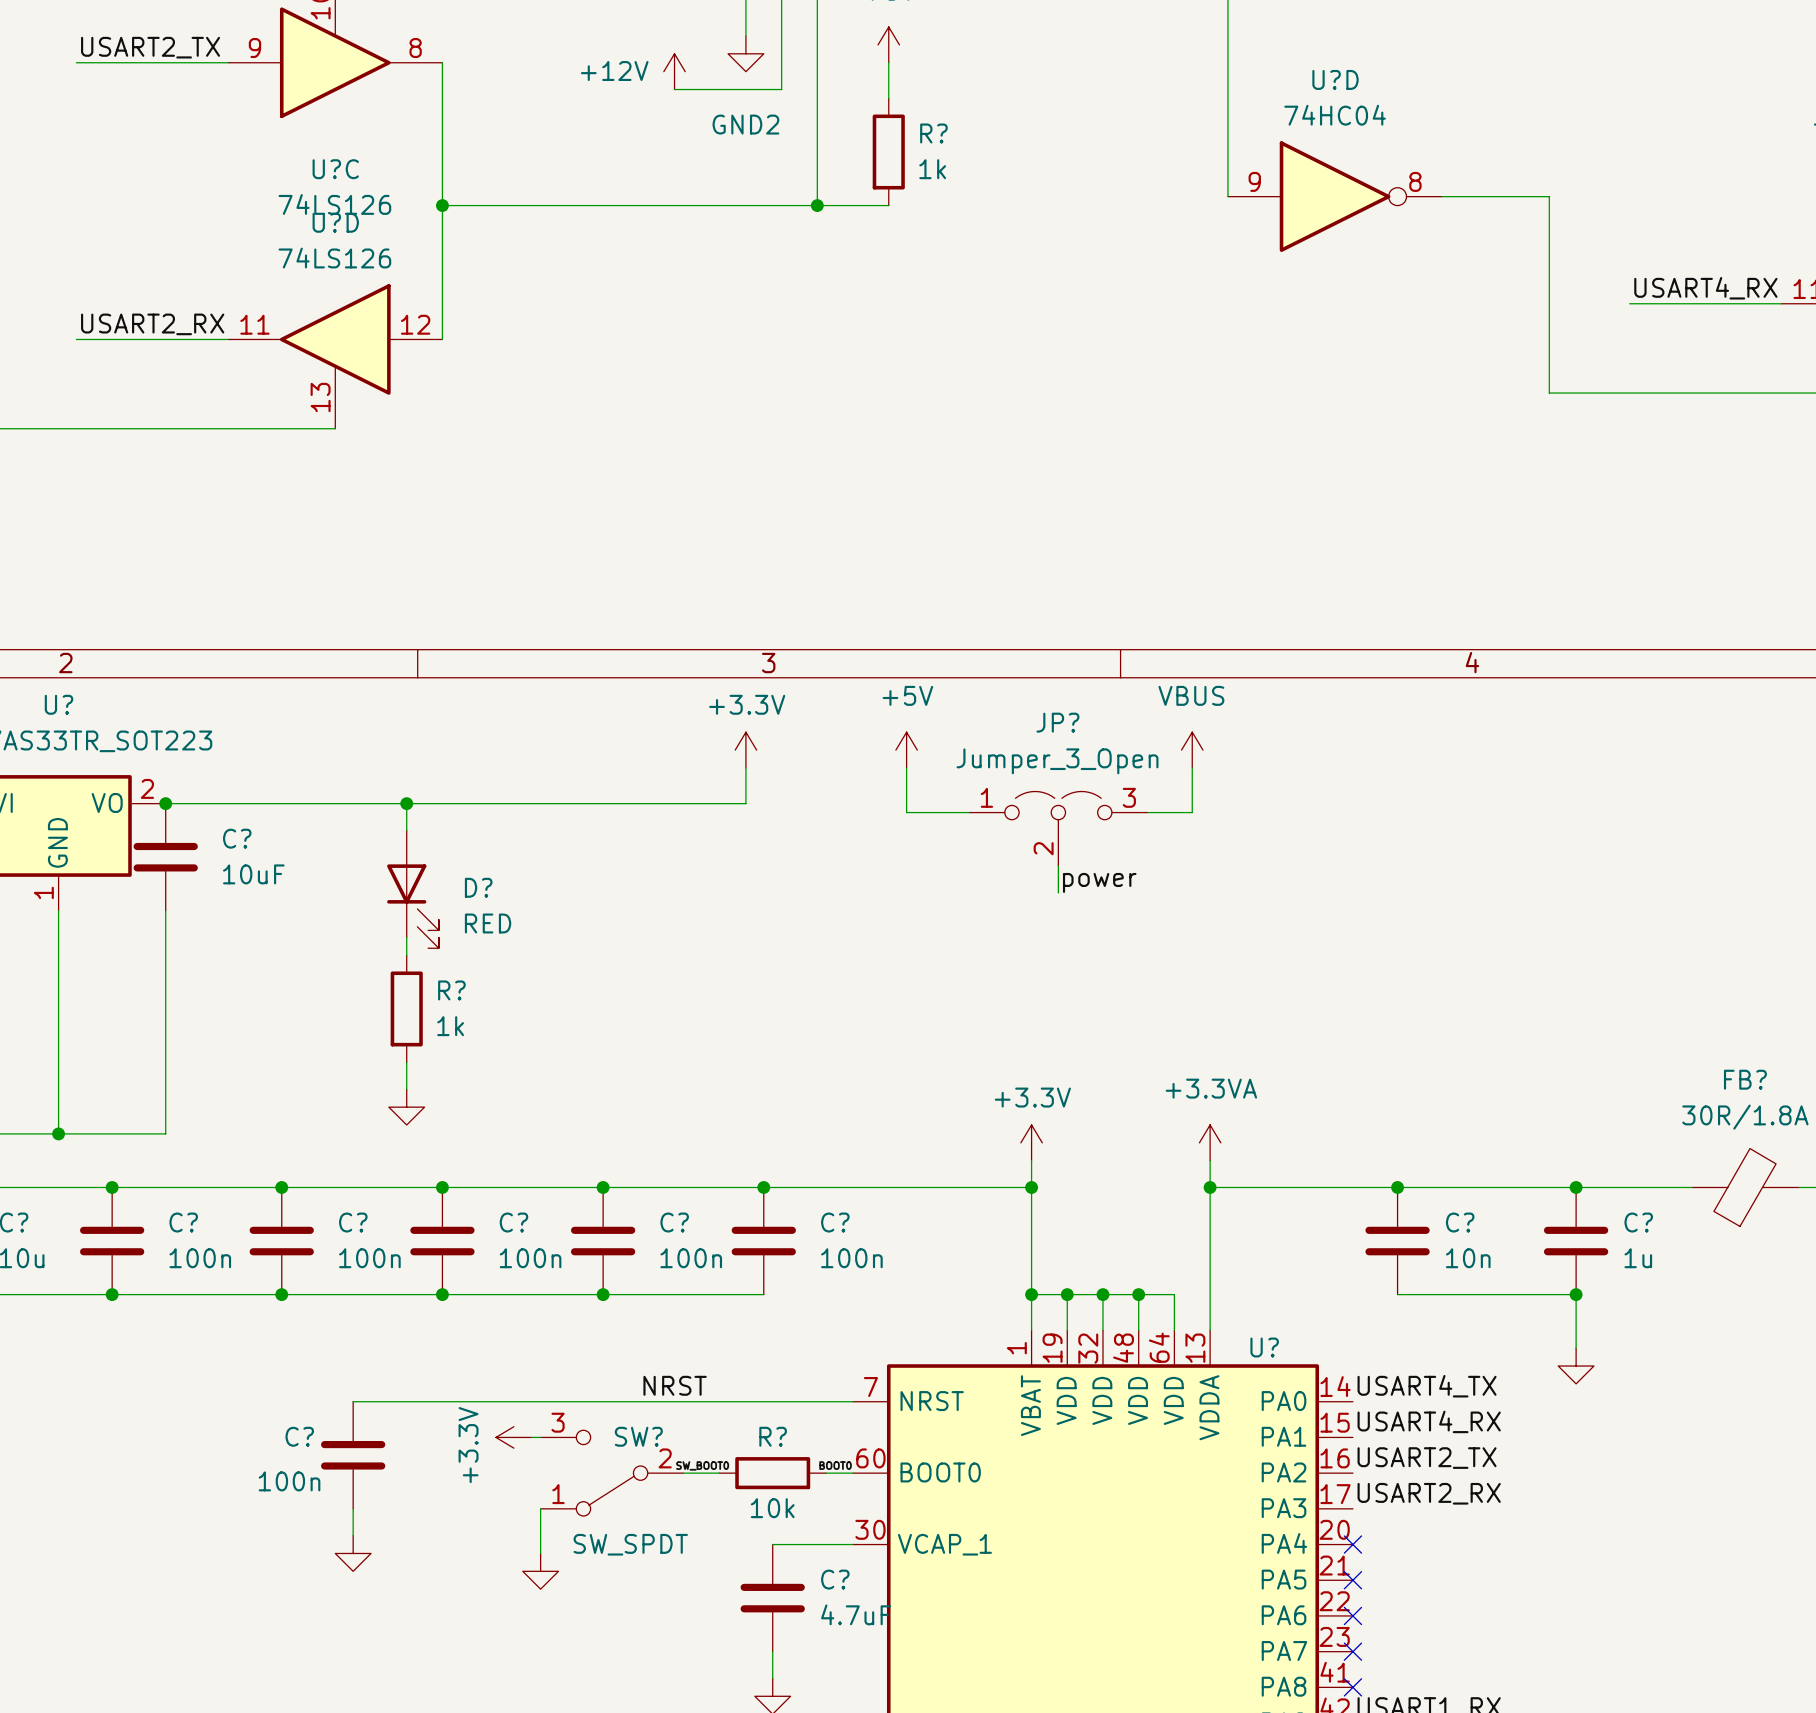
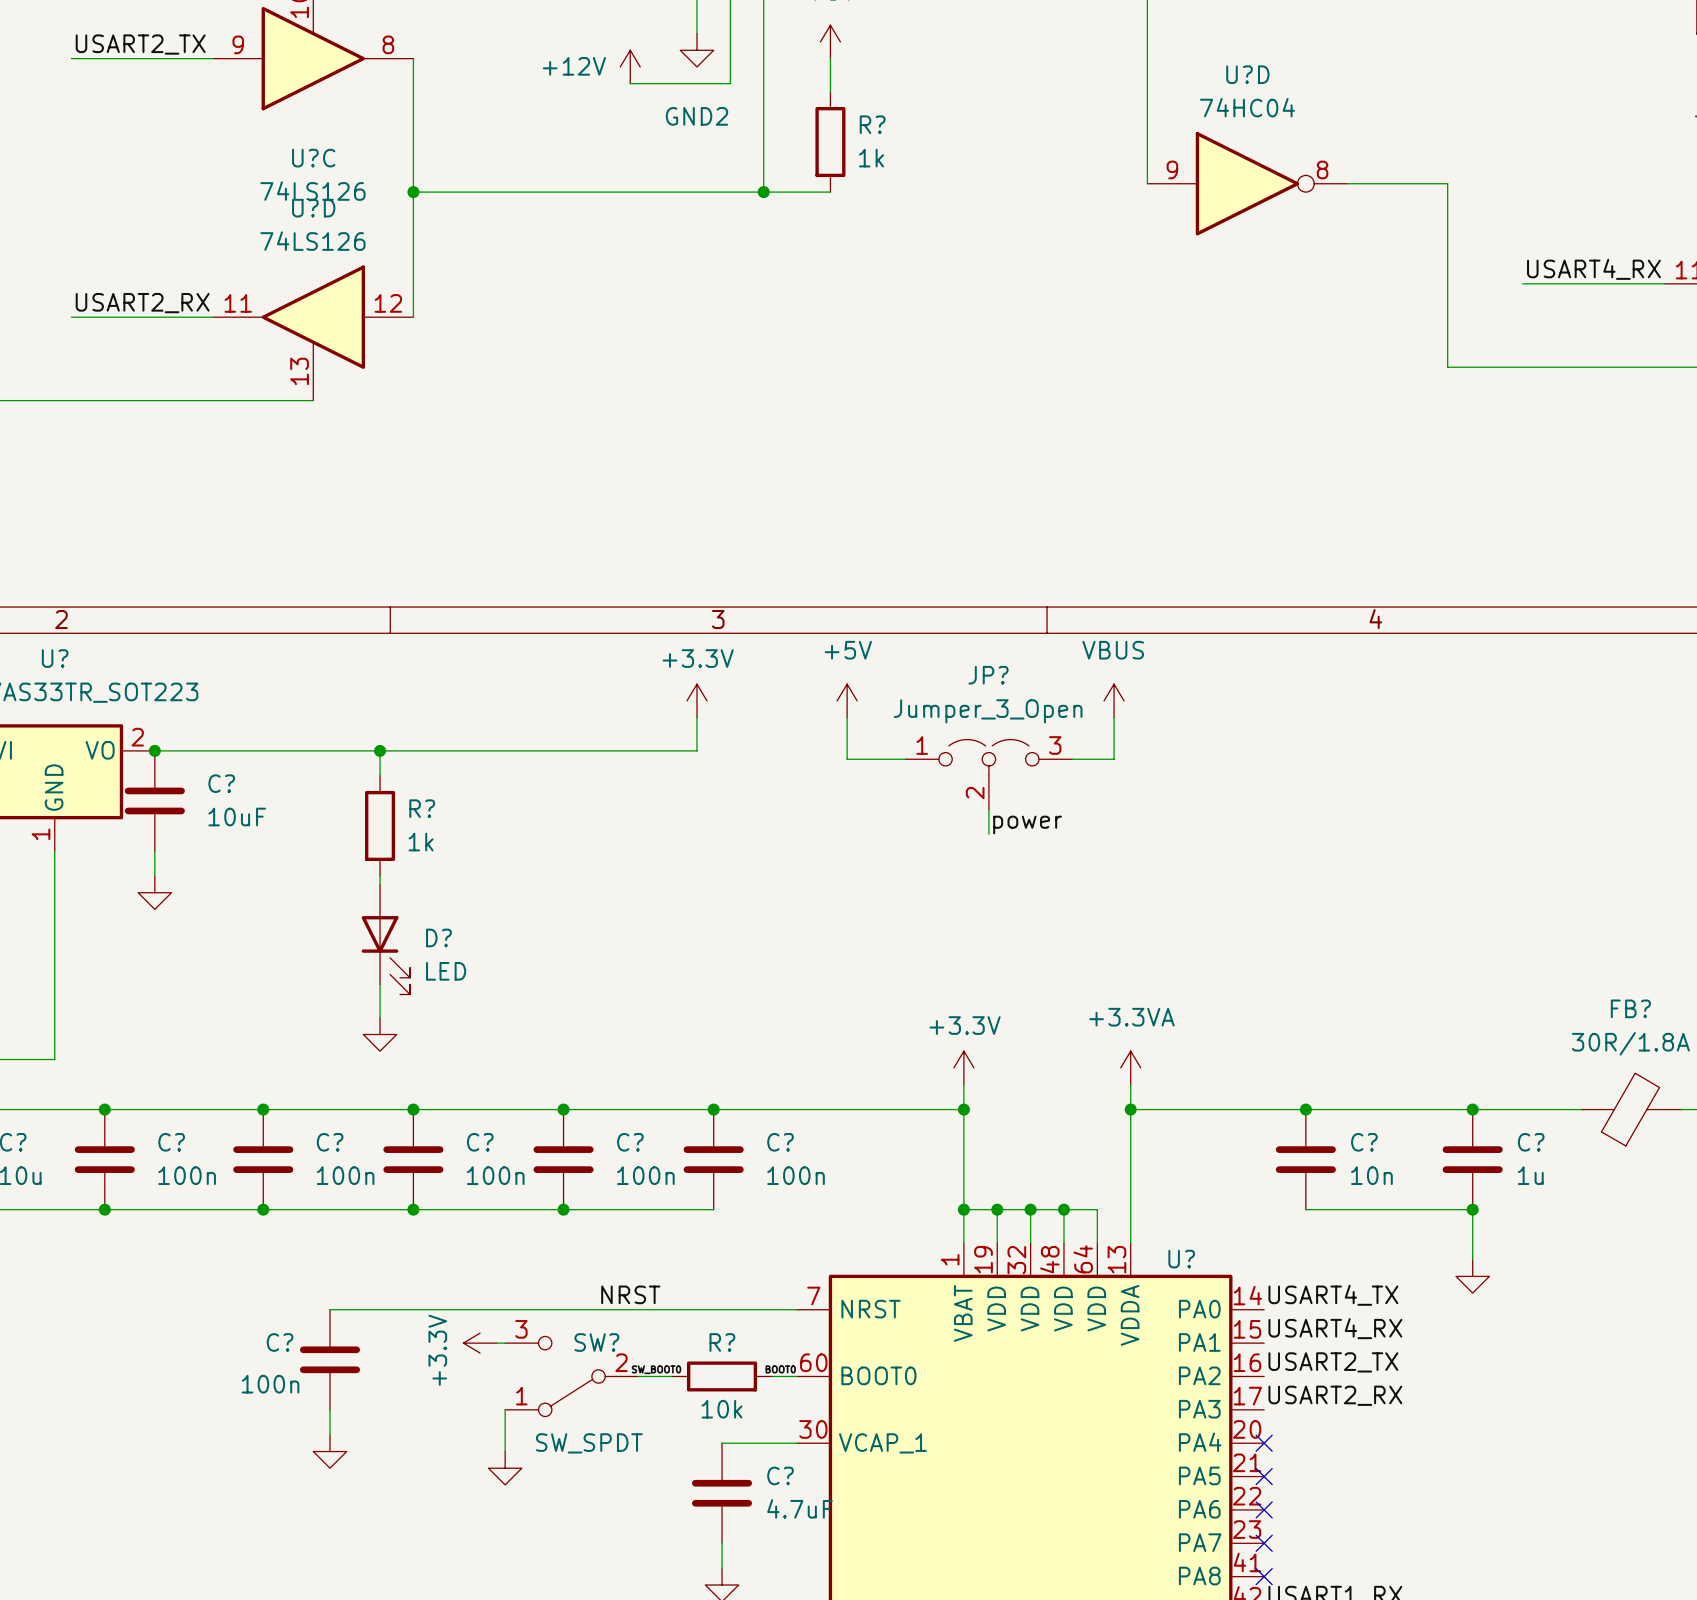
D?: RED (412, 889) -> none
wire: (165, 937) (165, 1133) (58, 1133) -> none
power symbol: none -> (154, 892)
D?: none -> LED (385, 939)
R? position: (406, 1008) -> (380, 825)
junction: (58, 1133) -> none

